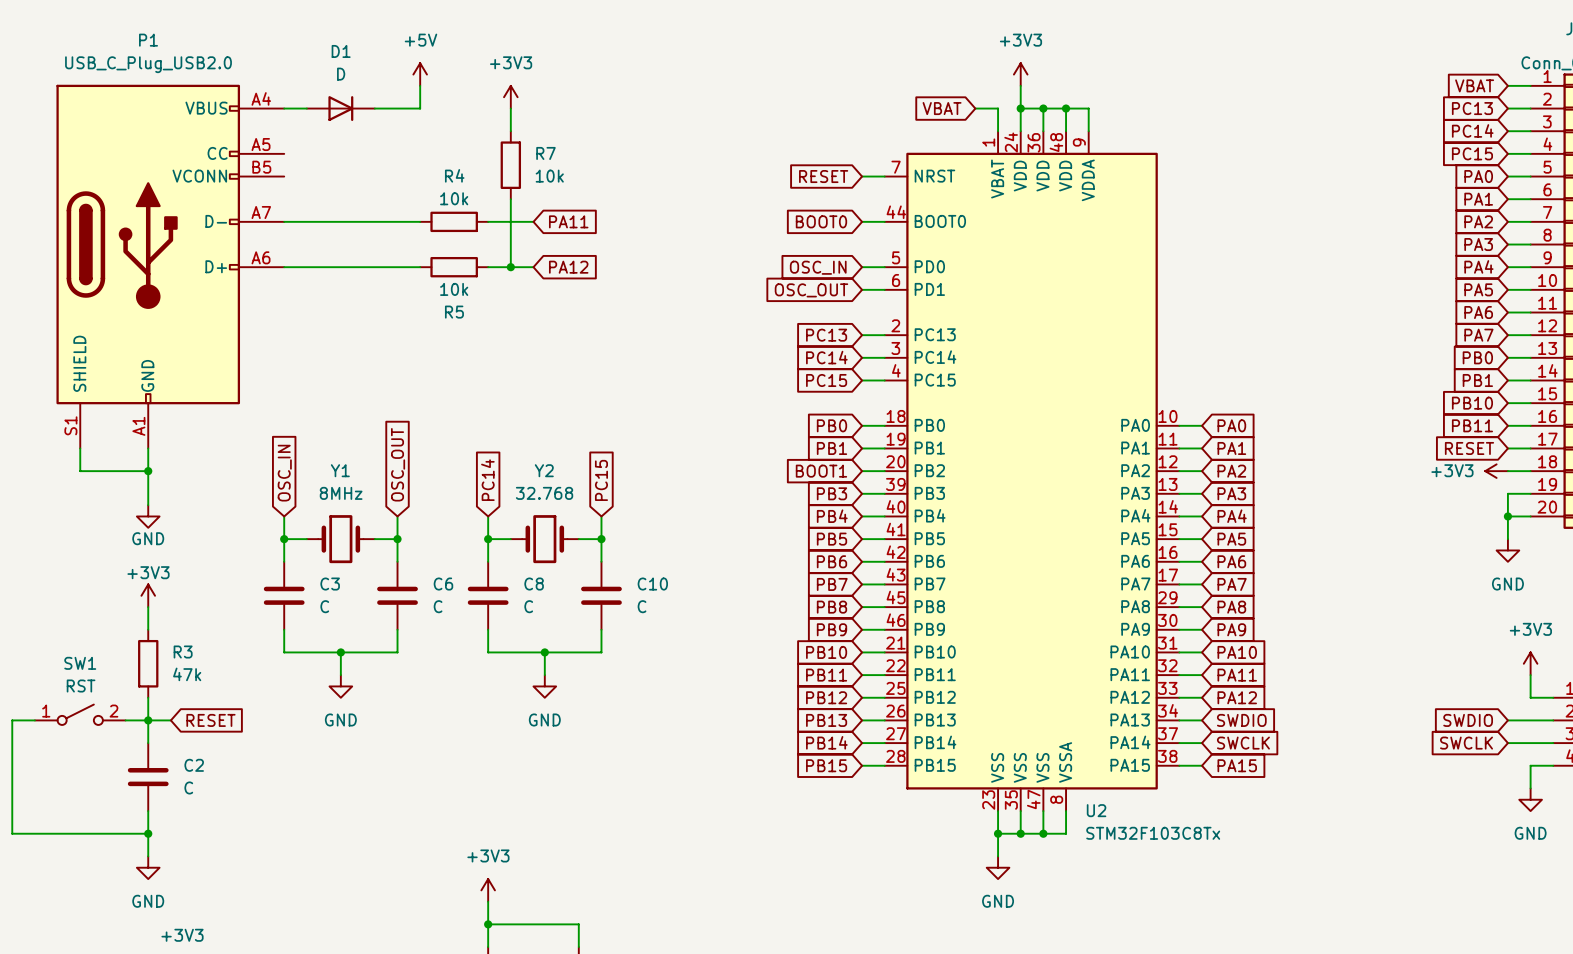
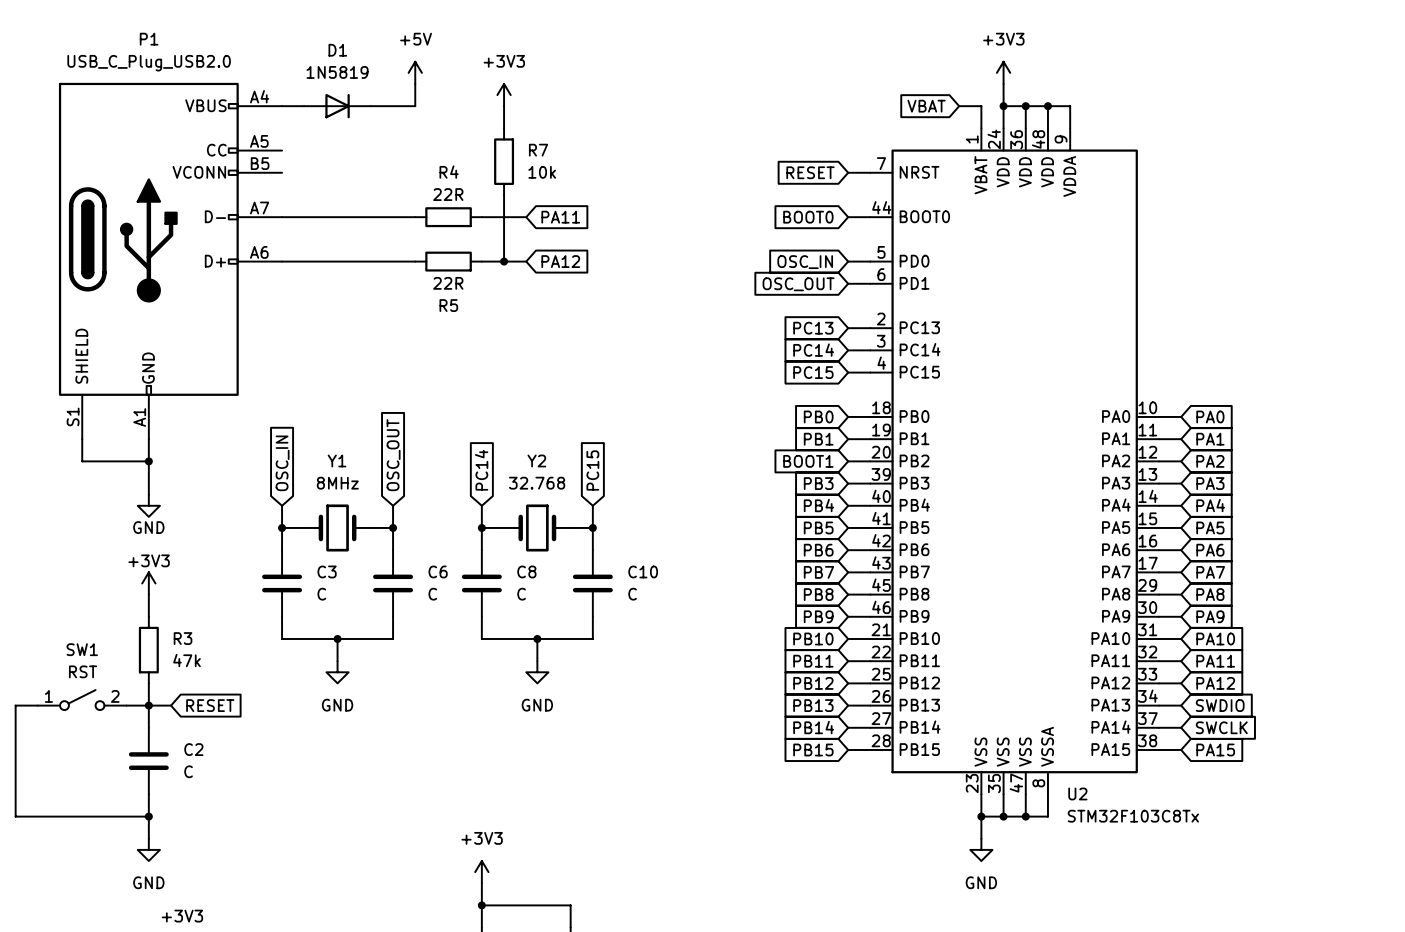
D1 value: D (341, 74) -> 1N5819 (337, 72)
R4 value: 10k (454, 198) -> 22R (448, 194)
R5 value: 10k (454, 289) -> 22R (448, 283)

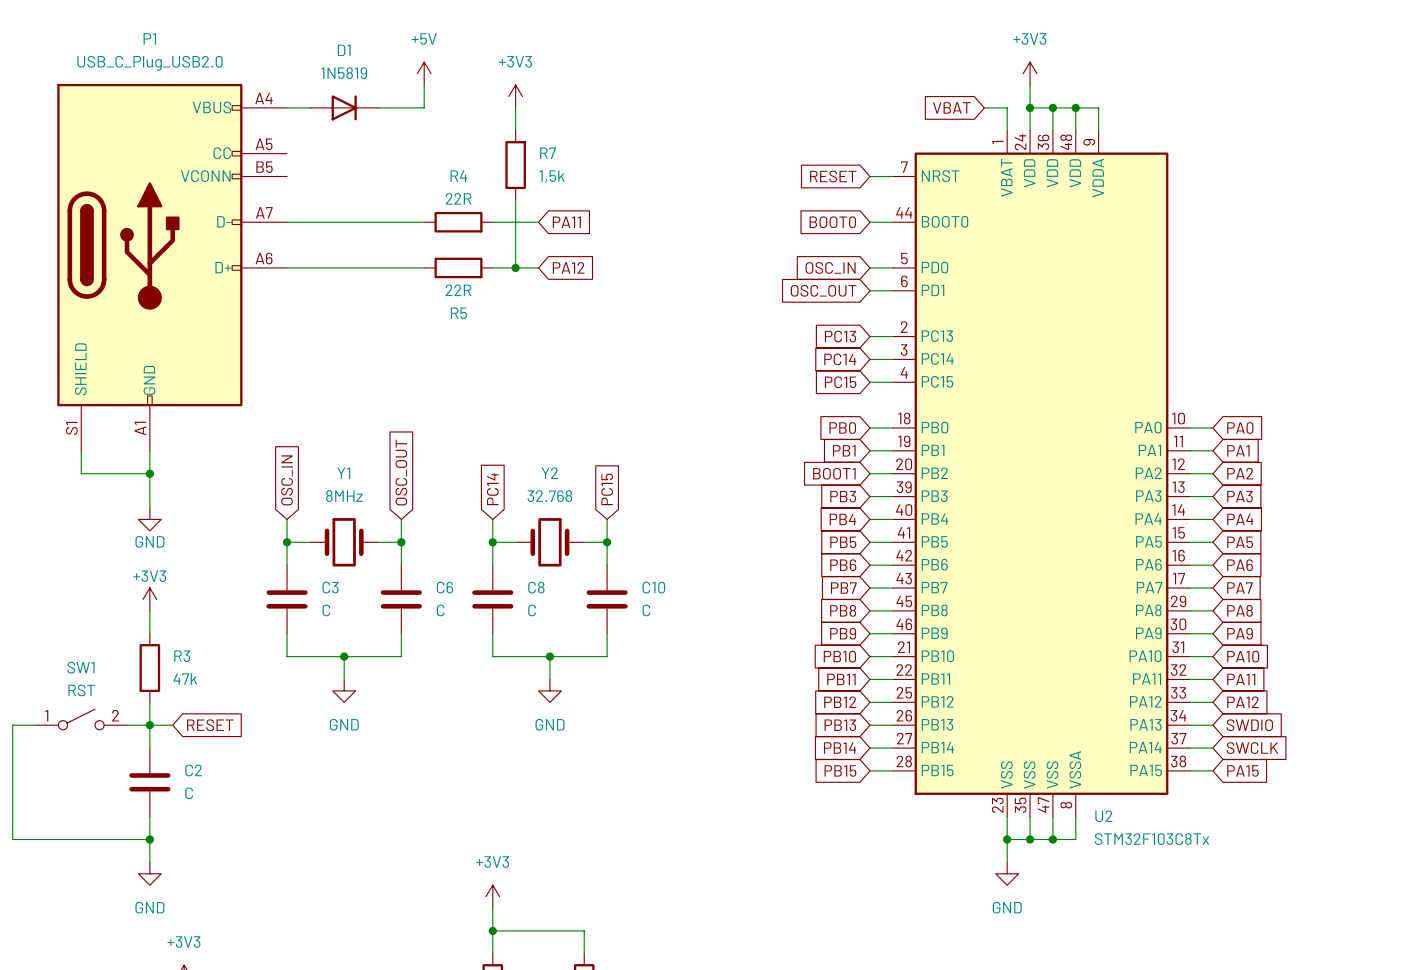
R7 value: 10k (542, 172) -> 1,5k (552, 176)

